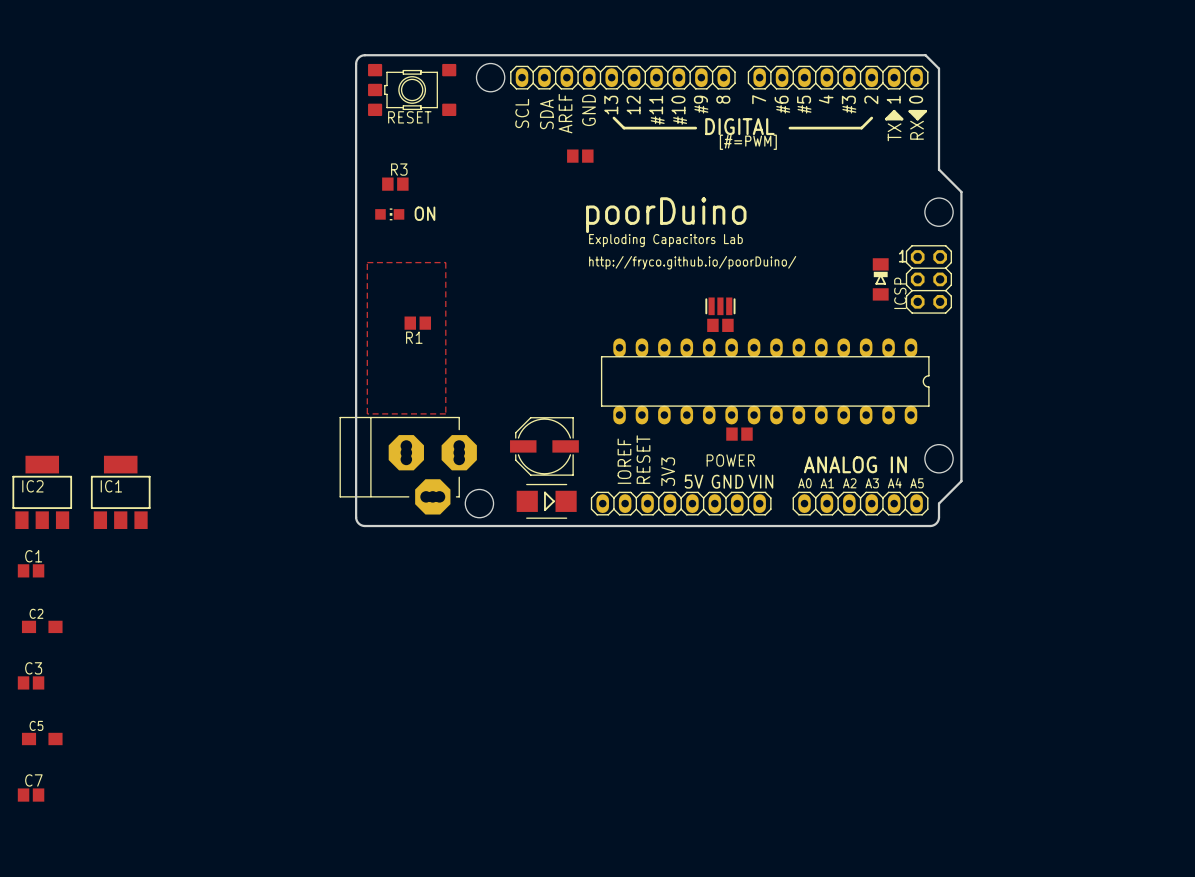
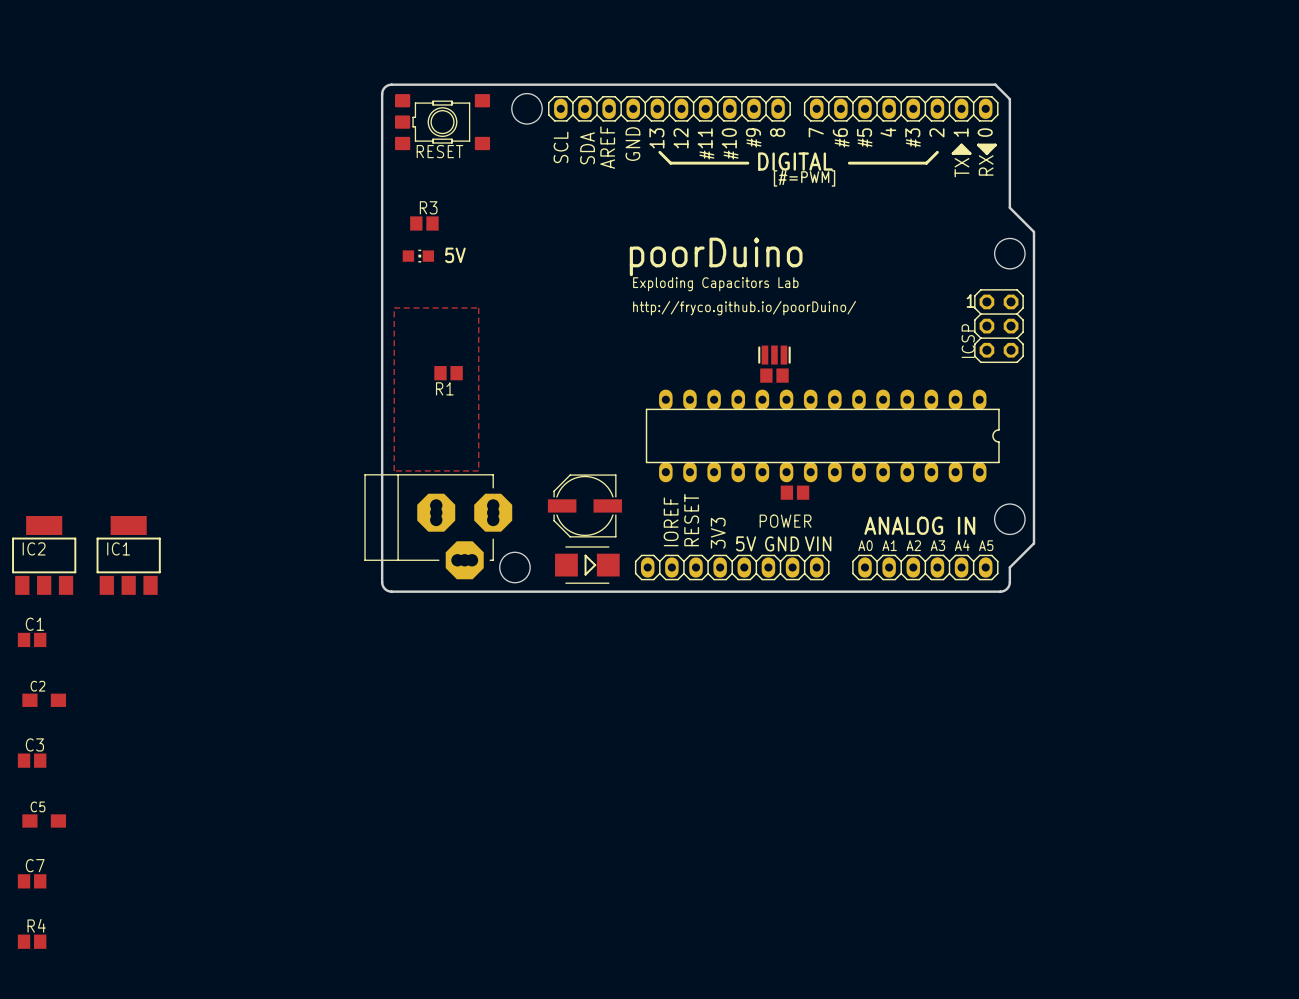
part: (580, 156) -> none
ON name: ON (424, 213) -> 5V (455, 255)
part: (880, 279) -> none
R4: none -> (32, 941)

